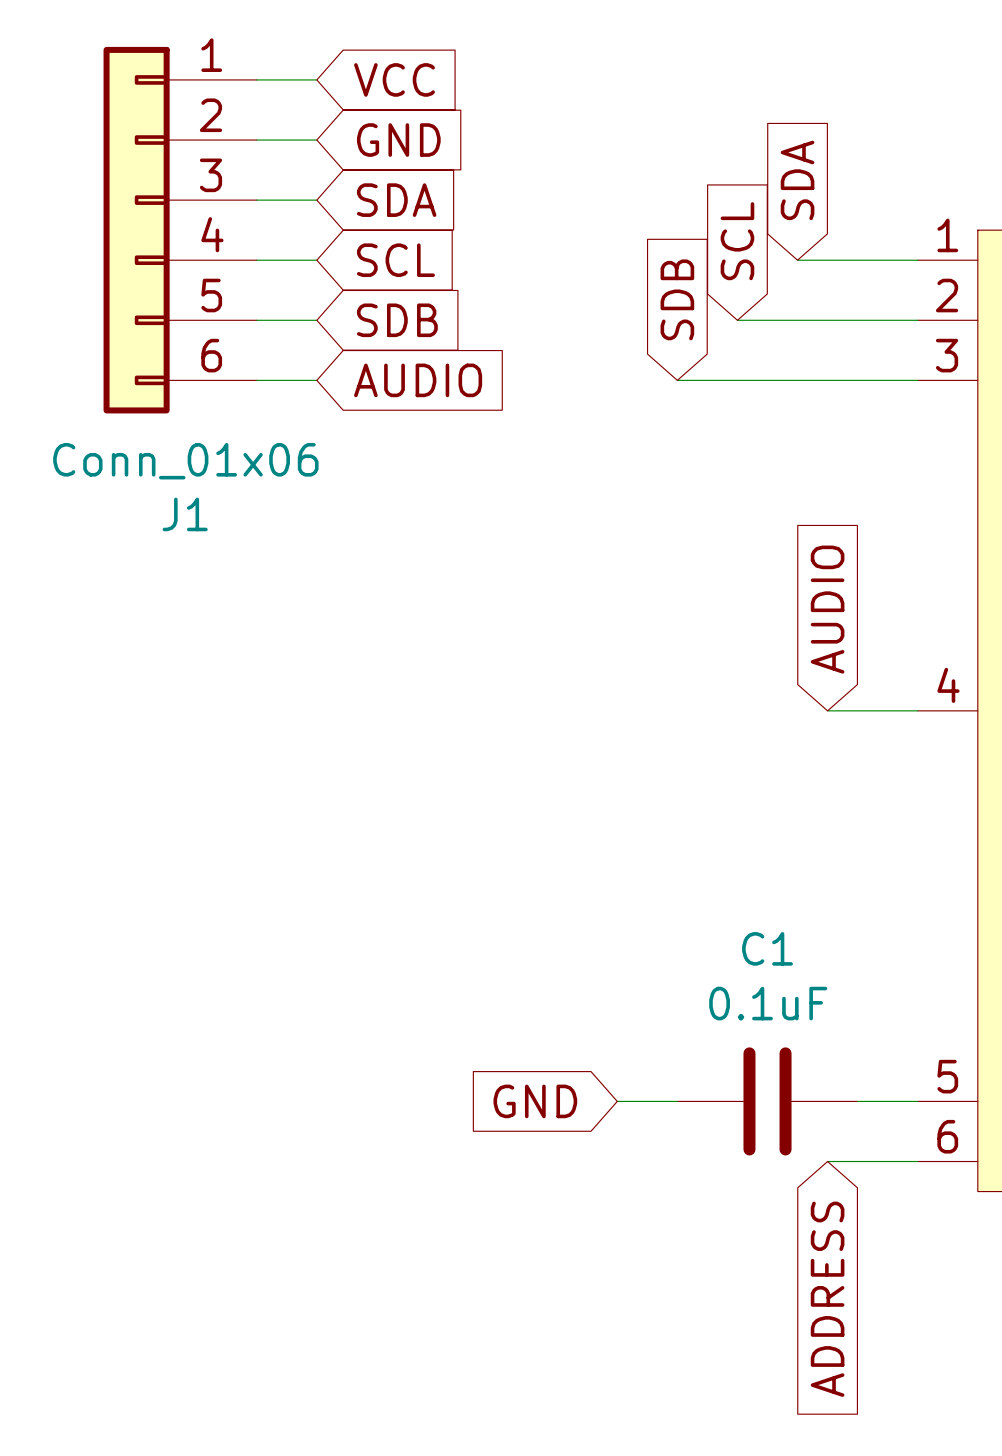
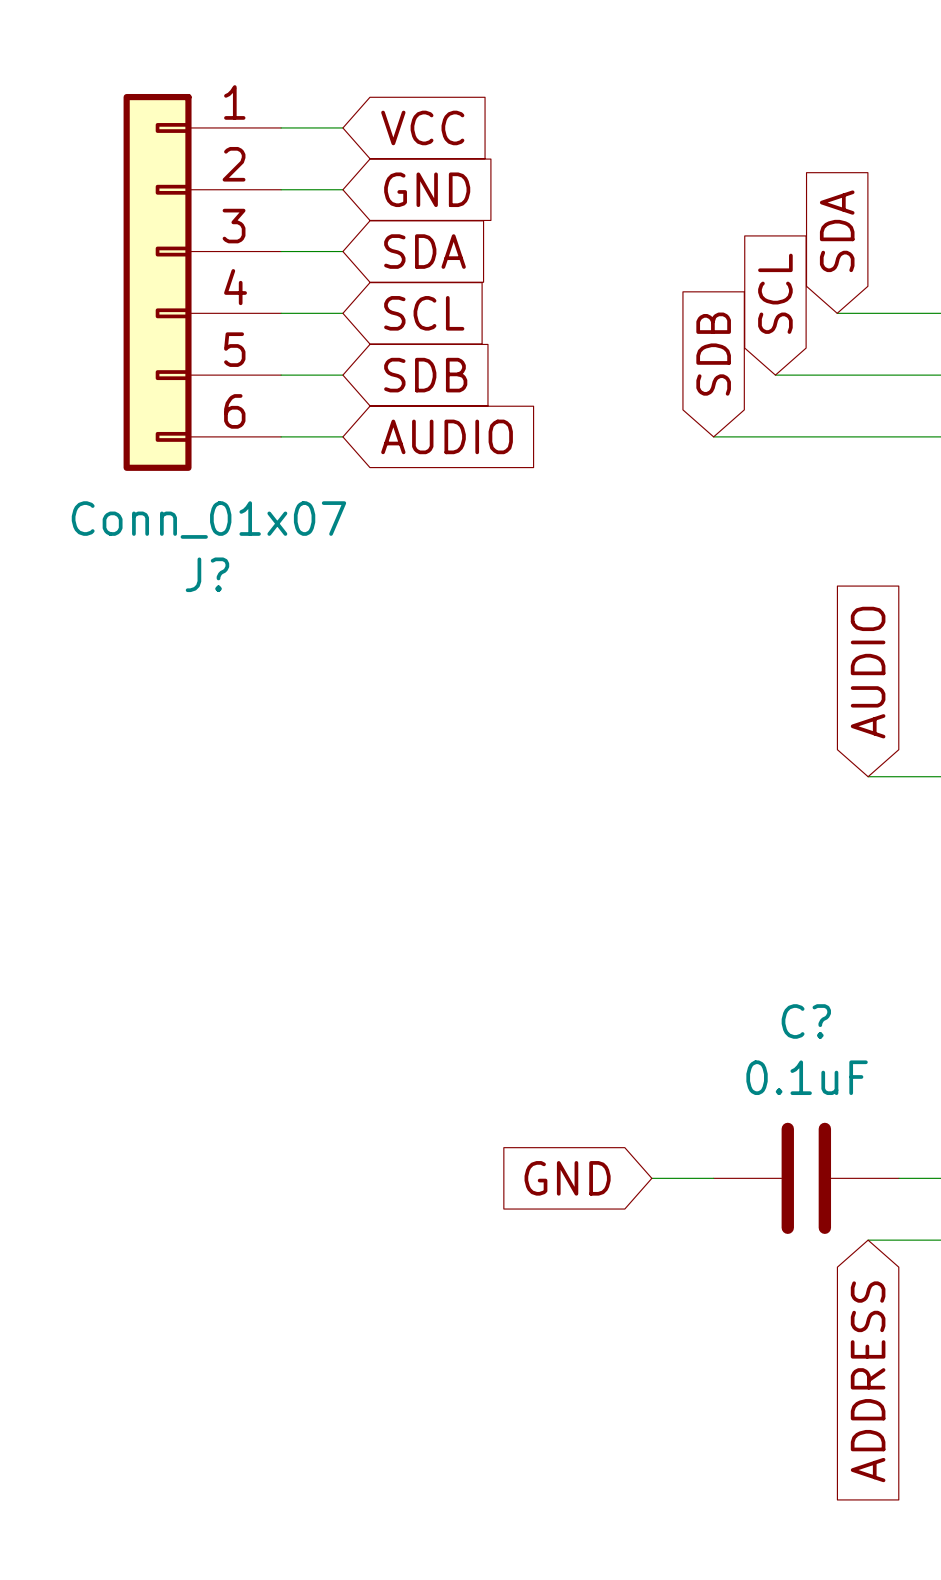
J1 value: Conn_01x06 (185, 461) -> Conn_01x07 (208, 520)
J1 name: J1 (185, 514) -> J? (207, 574)
C1 name: C1 (767, 948) -> C? (806, 1021)

